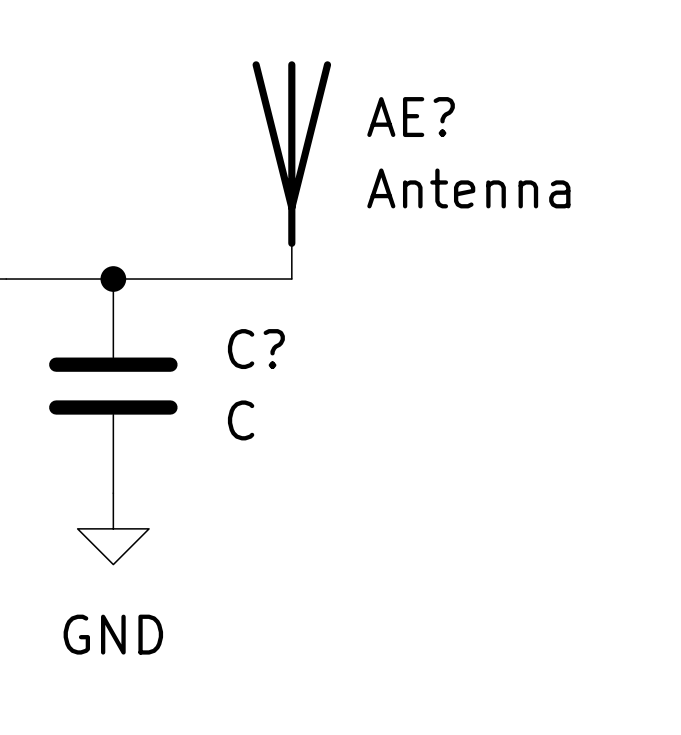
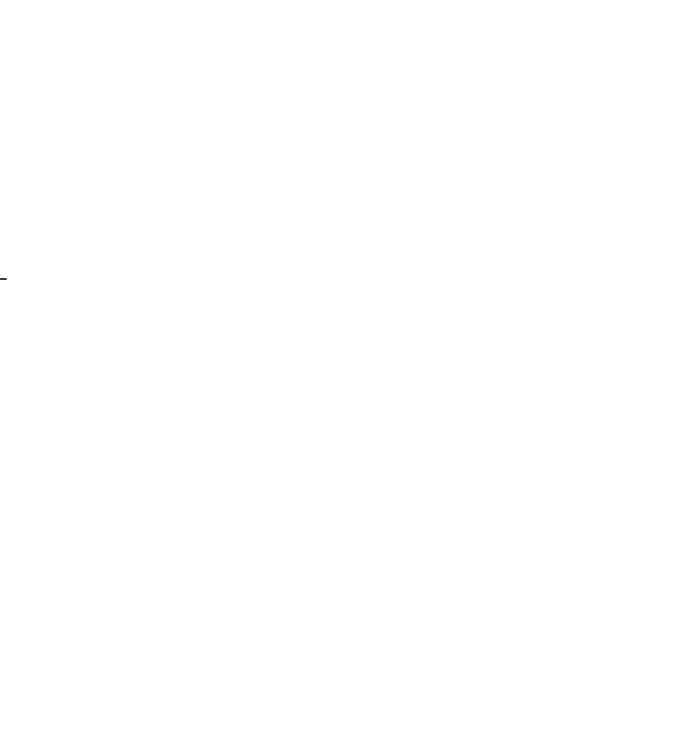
AE?: Antenna (291, 170) -> none
wire: (6, 279) (291, 279) -> none
junction: (113, 279) -> none
C?: C (113, 386) -> none
power symbol: GND (113, 528) -> none

